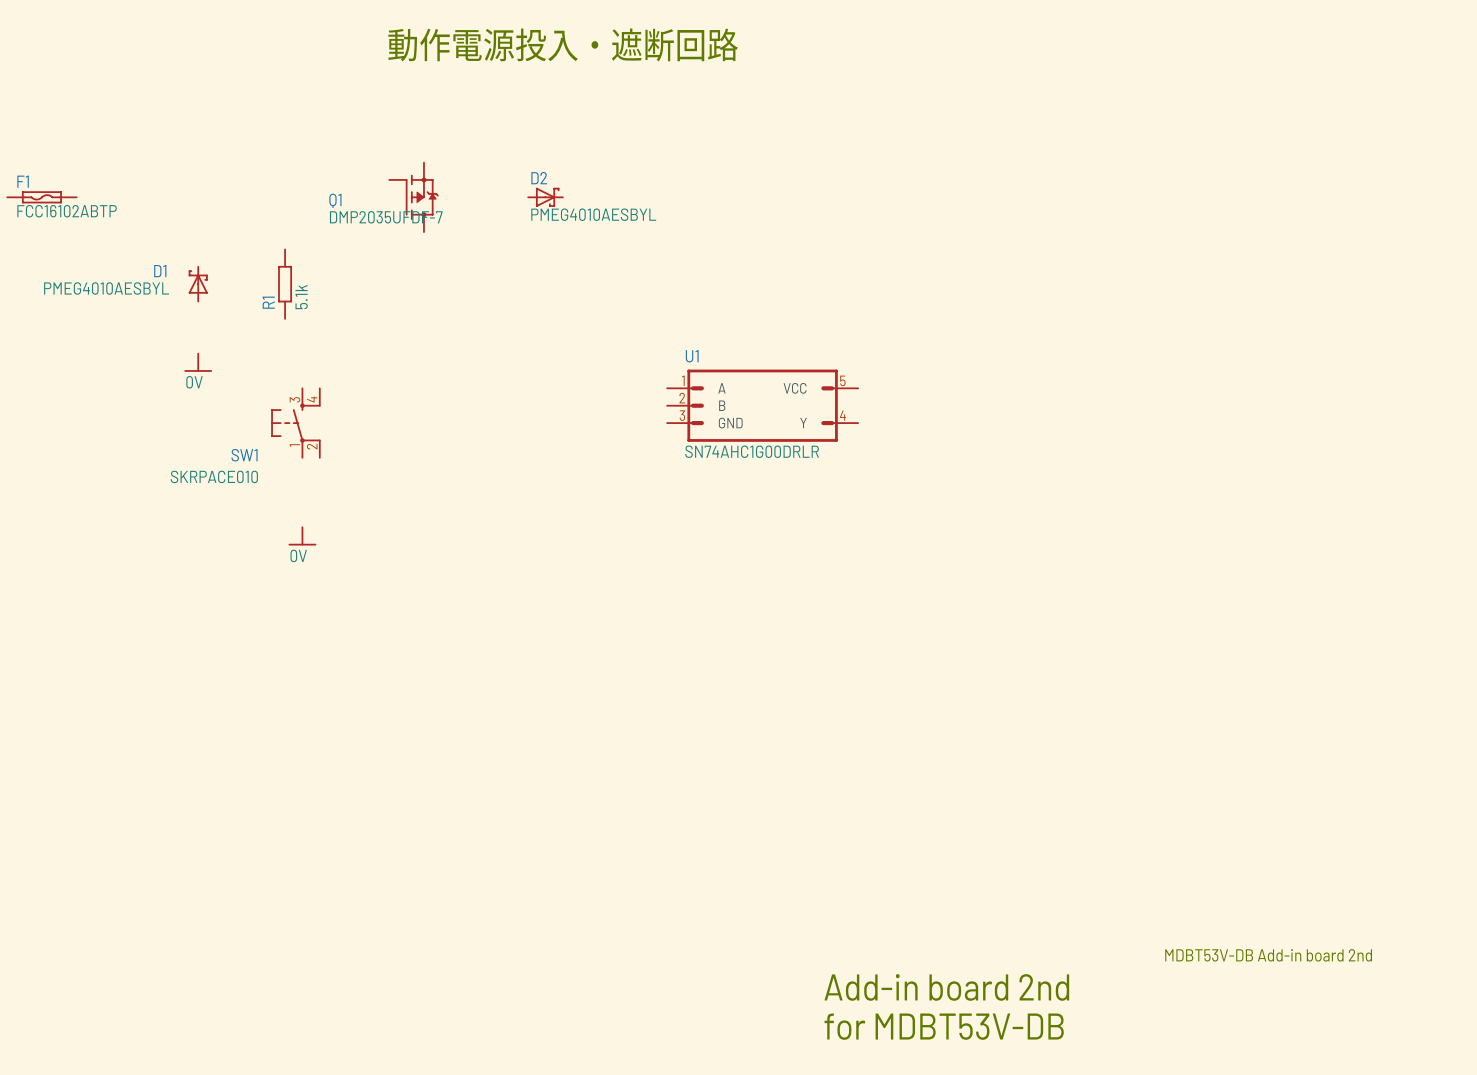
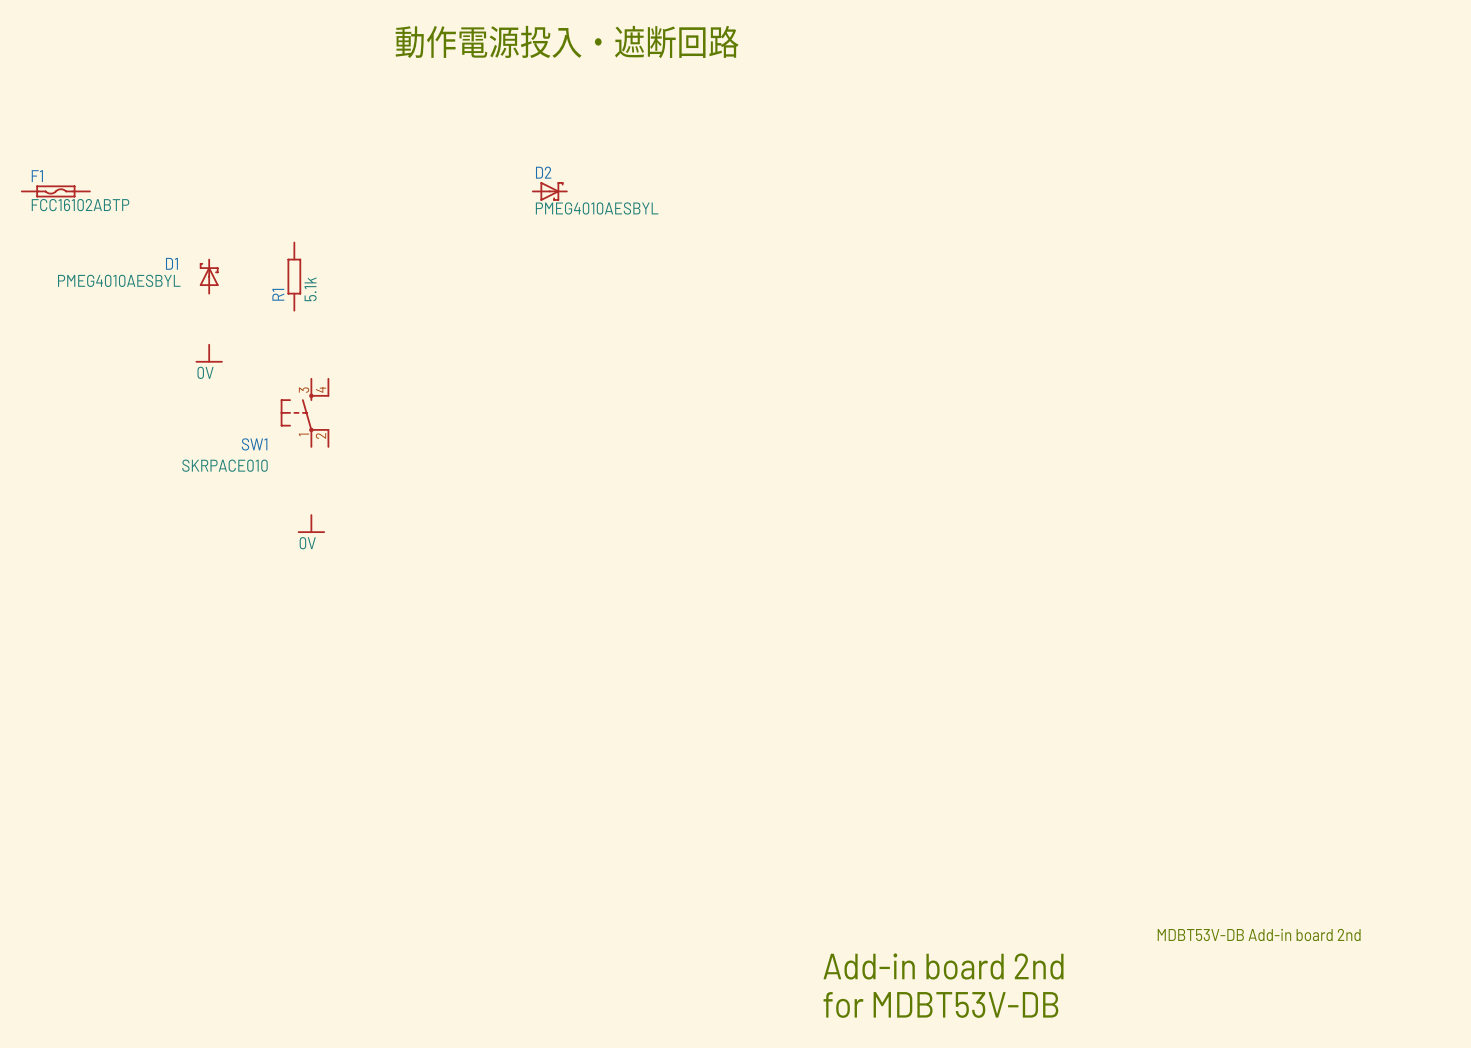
Q1: DMP2035UFDF-7 (413, 197) -> none
U1: SN74AHC1G00DRLR (762, 405) -> none

